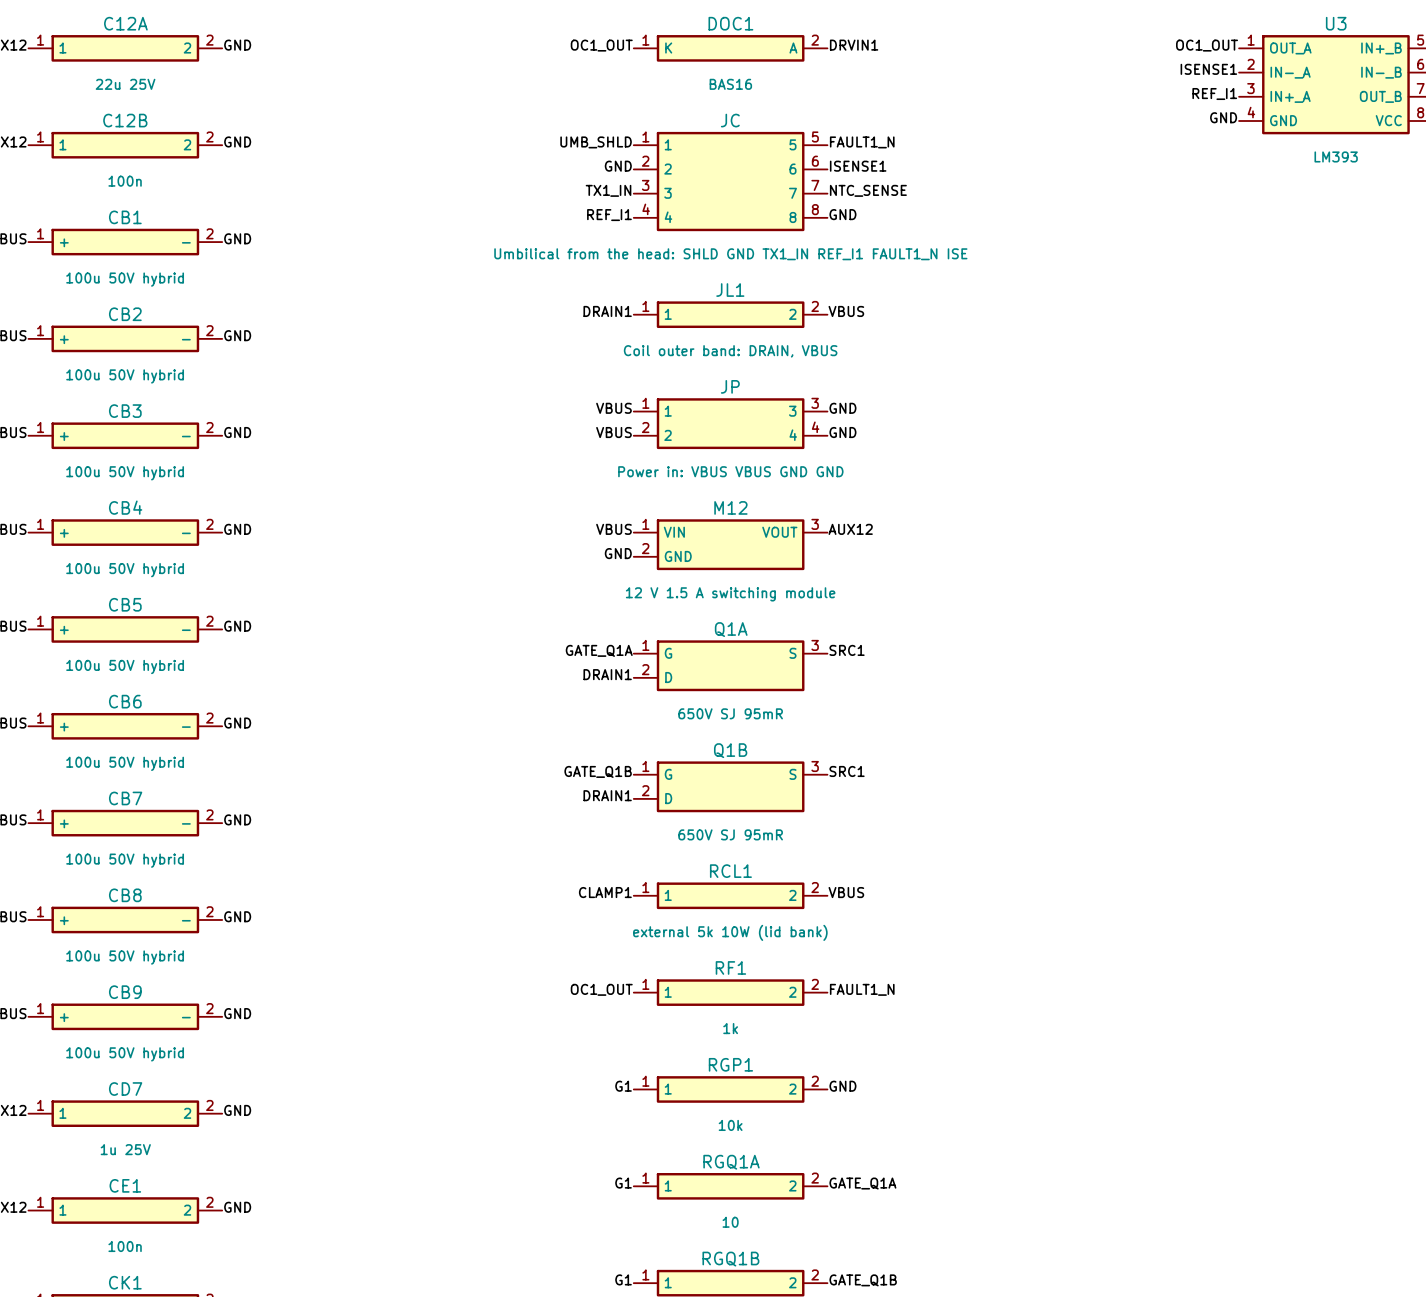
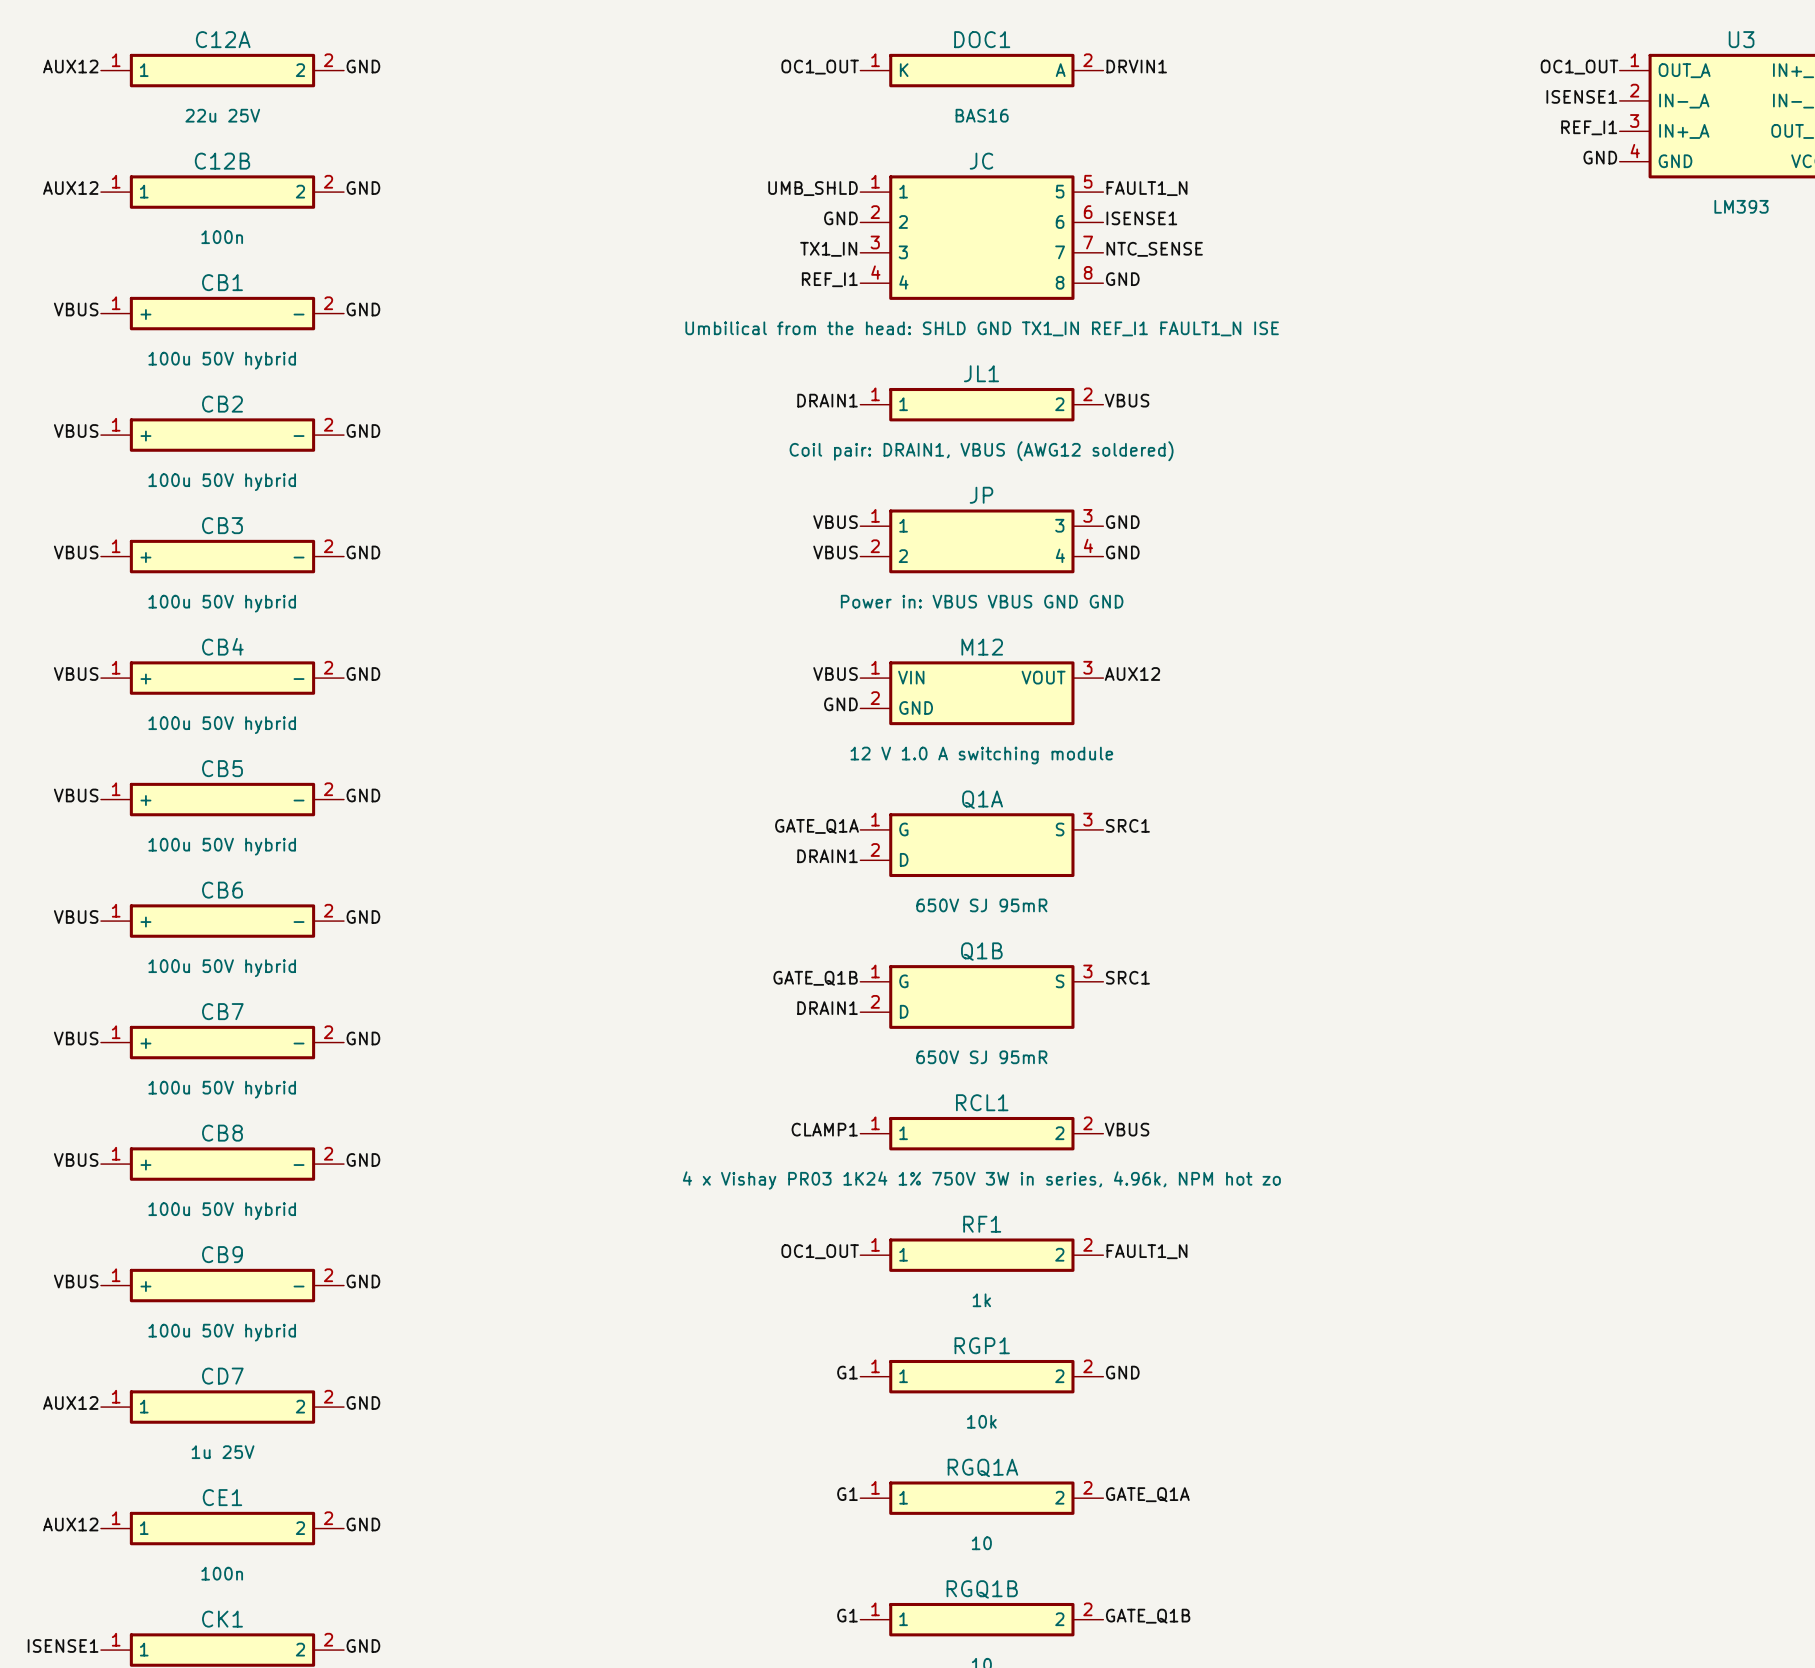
JL1 value: Coil outer band: DRAIN, VBUS (730, 351) -> Coil pair: DRAIN1, VBUS (AWG12 soldered) (981, 451)
M12 value: 12 V 1.5 A switching module (730, 594) -> 12 V 1.0 A switching module (981, 755)
RCL1 value: external 5k 10W (lid bank) (730, 932) -> 4 x Vishay PR03 1K24 1% 750V 3W in series, 4.96k, NPM hot zo (981, 1180)

